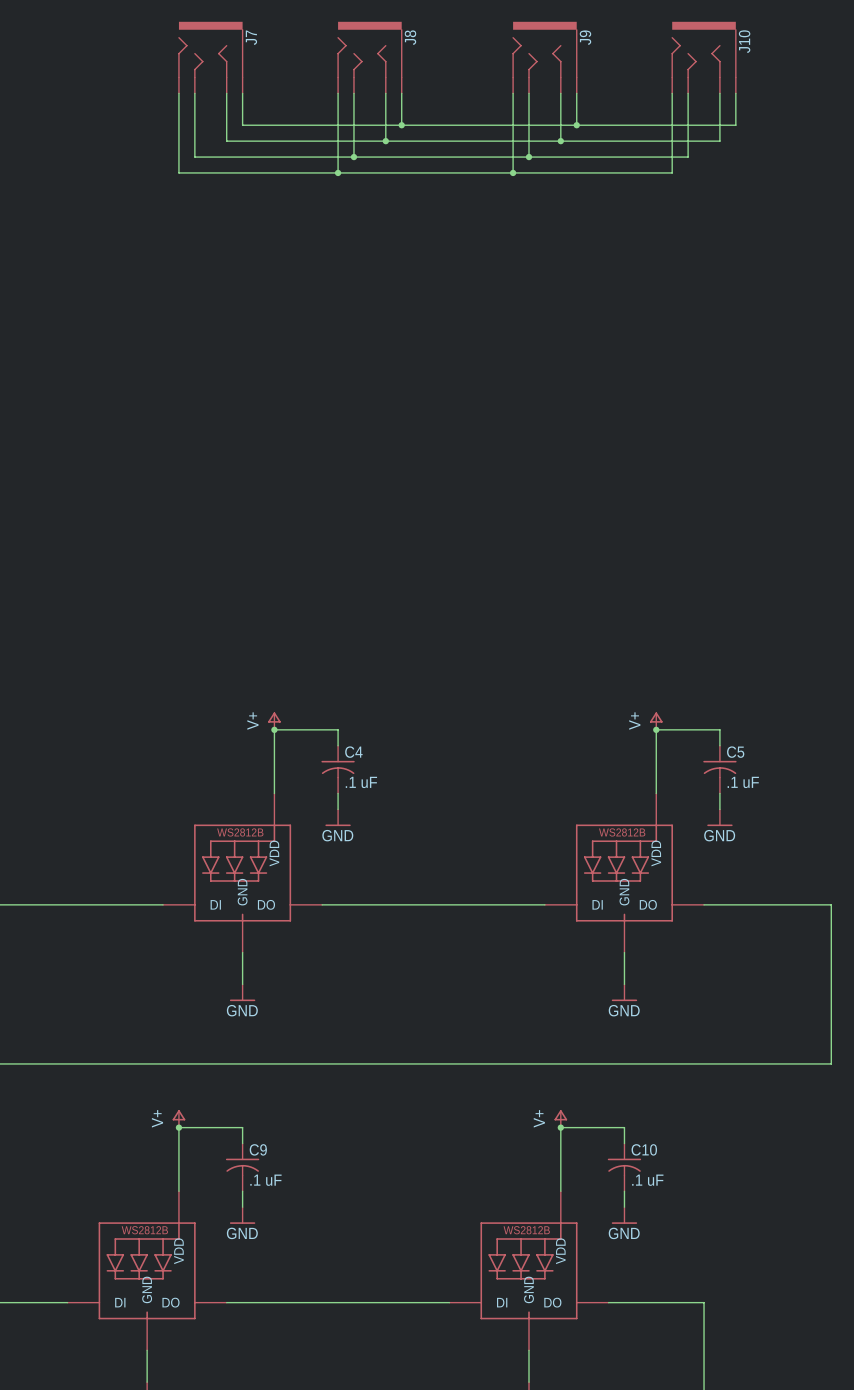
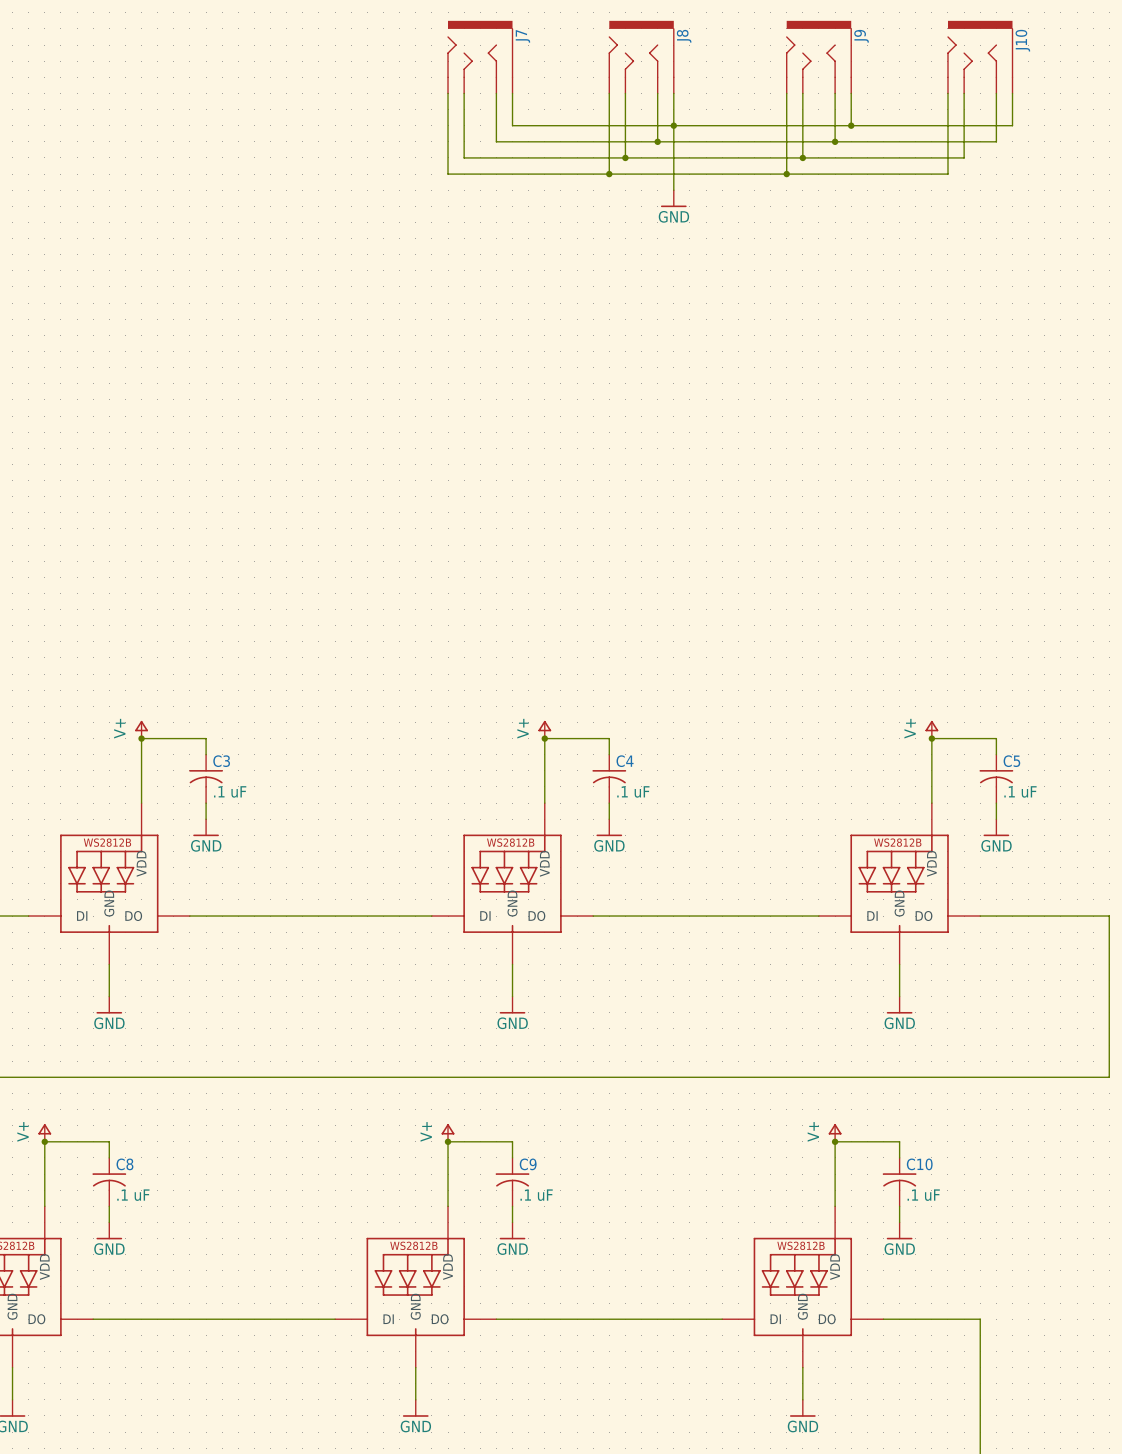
wire: none -> (673, 125) (673, 190)
power symbol: none -> GND (673, 198)

